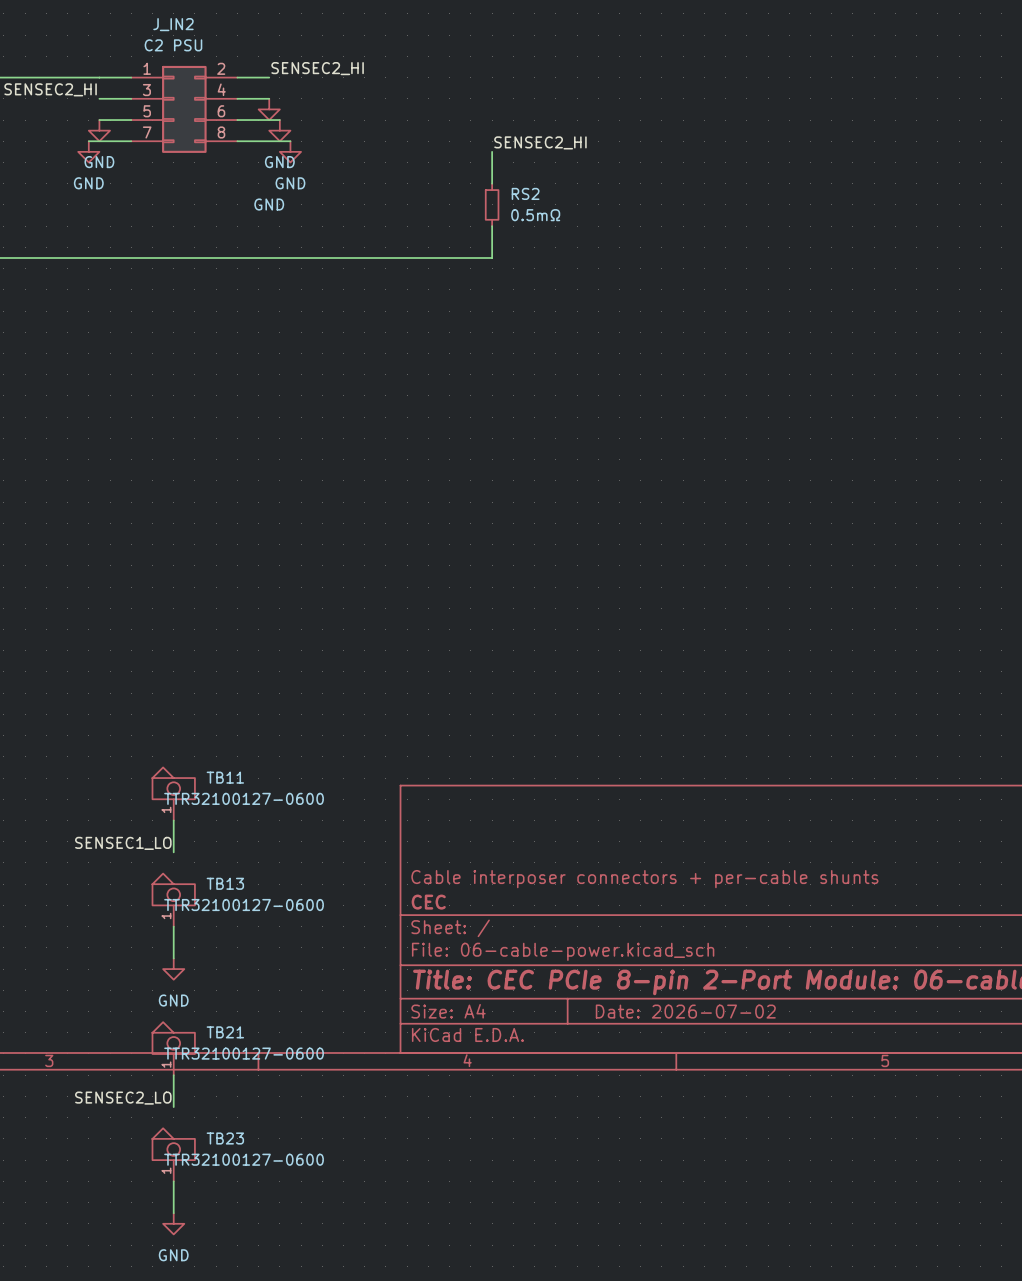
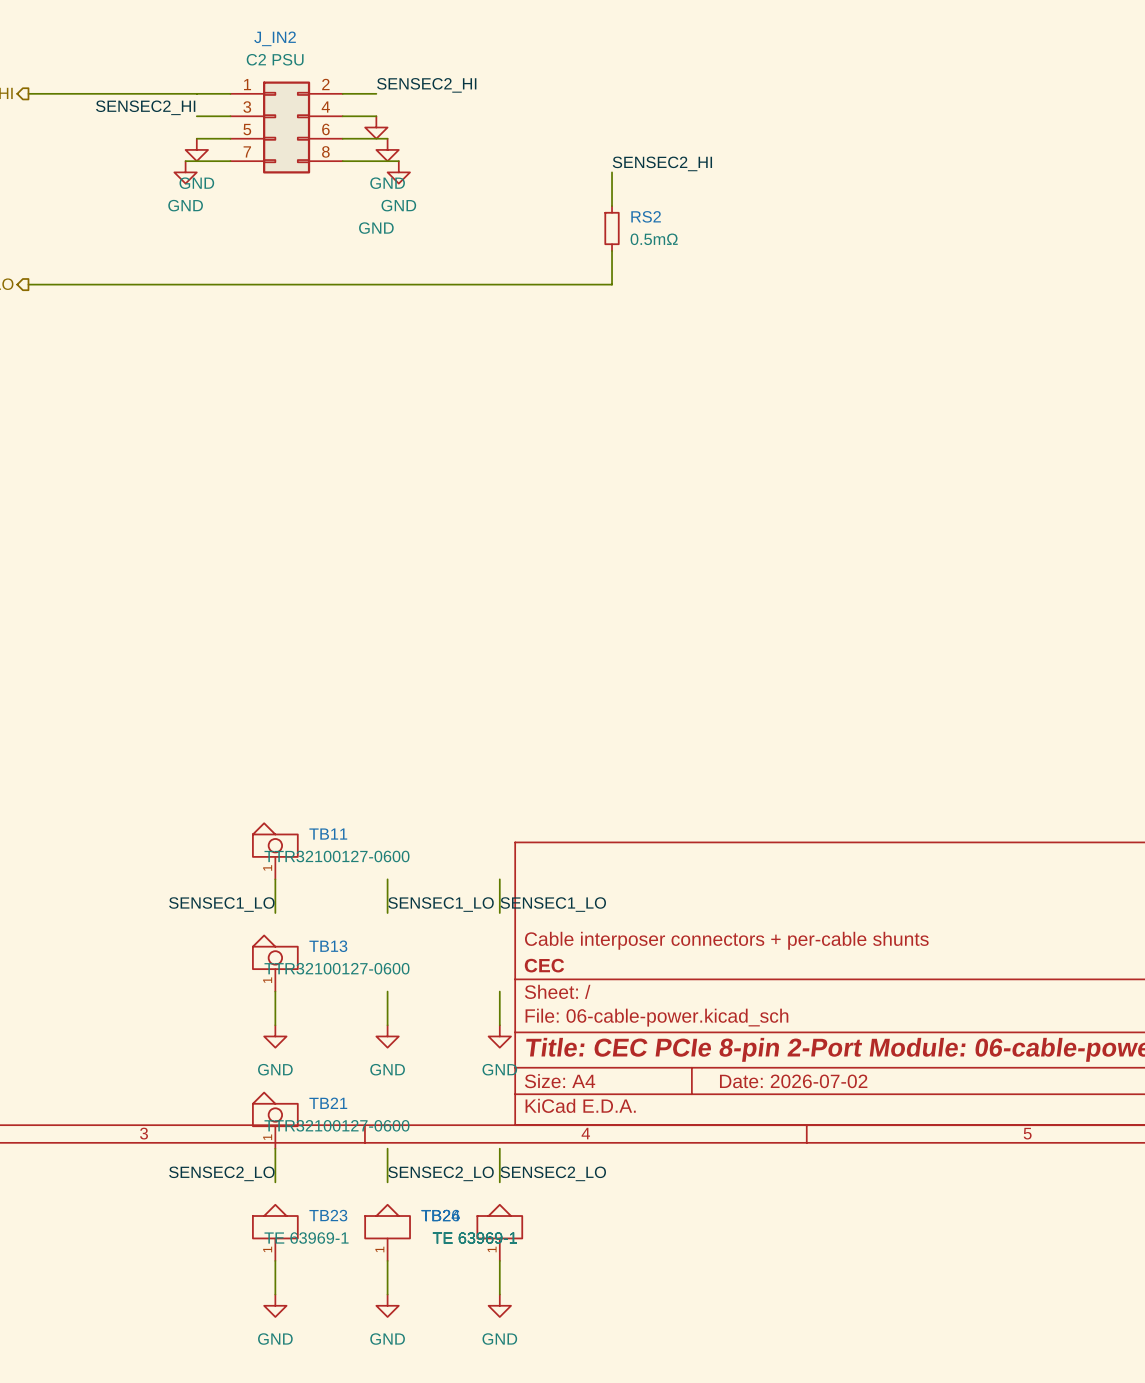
wire: none -> (387, 879) (387, 913)
wire: none -> (499, 879) (499, 913)
label: none -> SENSEC1_LO (441, 904)
label: none -> SENSEC1_LO (553, 904)
wire: none -> (387, 991) (387, 1025)
wire: none -> (499, 991) (499, 1025)
power symbol: none -> GND (387, 1036)
power symbol: none -> GND (499, 1036)
wire: none -> (387, 1148) (387, 1182)
wire: none -> (499, 1148) (499, 1182)
label: none -> SENSEC2_LO (441, 1173)
label: none -> SENSEC2_LO (553, 1173)
TB23 symbol: [151, 1127, 196, 1182] -> [252, 1203, 299, 1261]
part: none -> TE 63969-1 (387, 1232)
part: none -> TE 63969-1 (499, 1232)
TB23 value: TTR32100127-0600 (244, 1159) -> TE 63969-1 (306, 1238)
wire: none -> (387, 1260) (387, 1294)
wire: none -> (499, 1260) (499, 1294)
power symbol: none -> GND (387, 1305)
power symbol: none -> GND (499, 1305)

